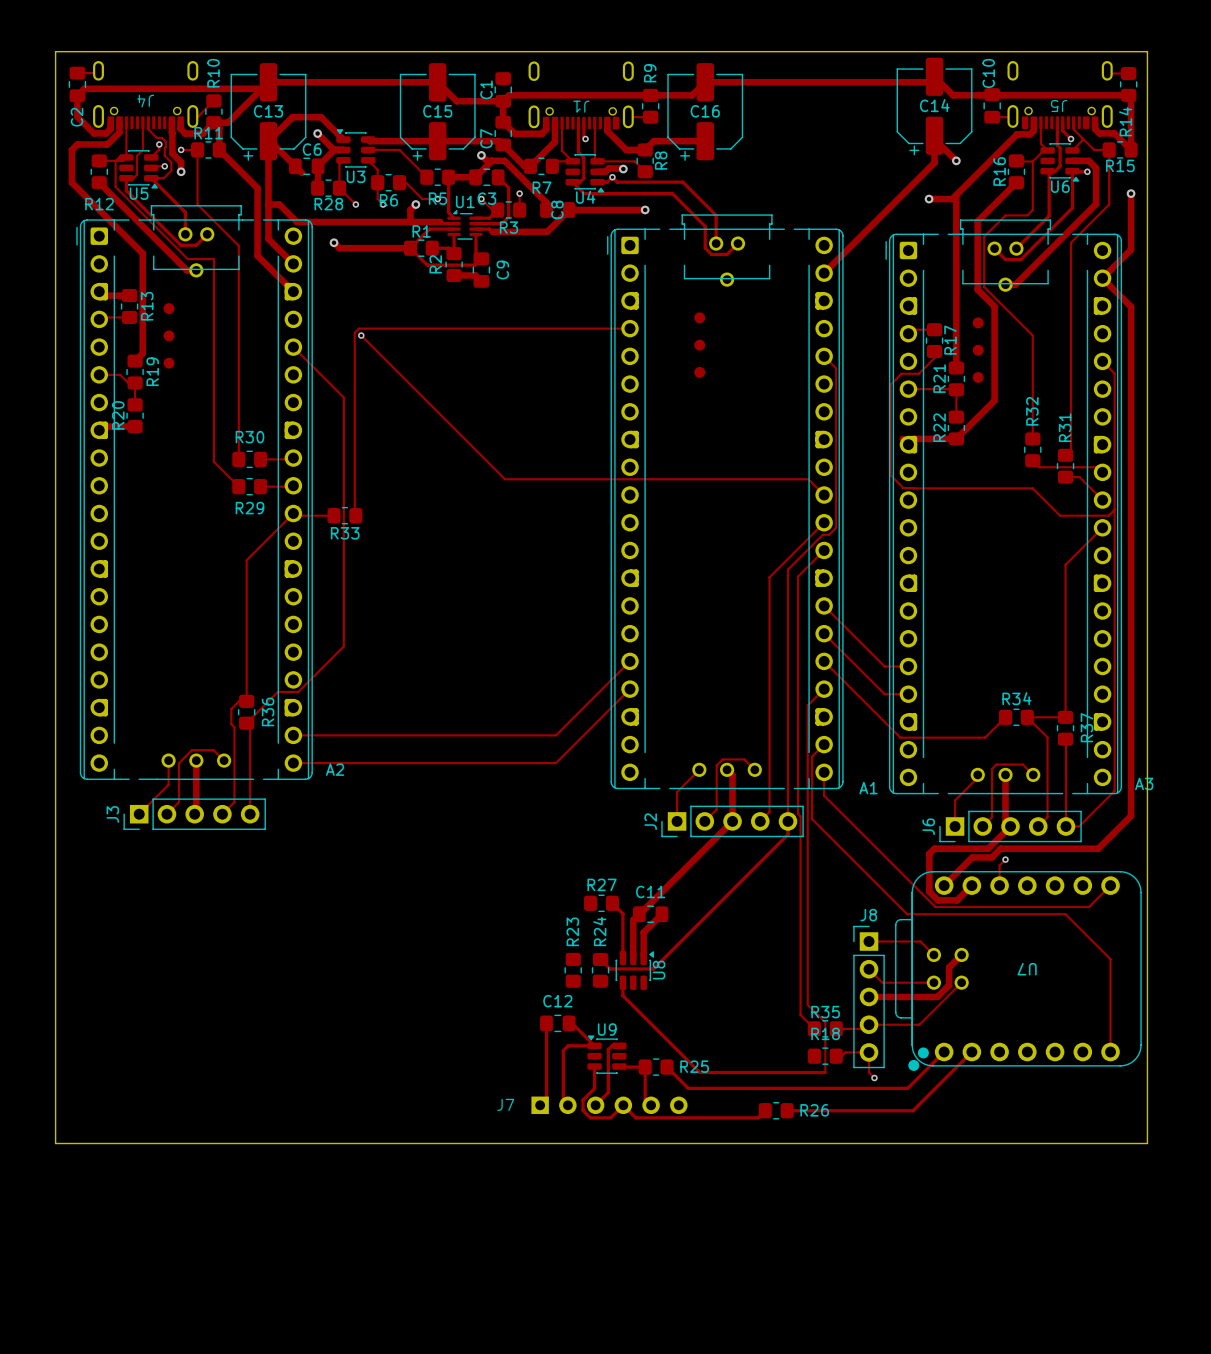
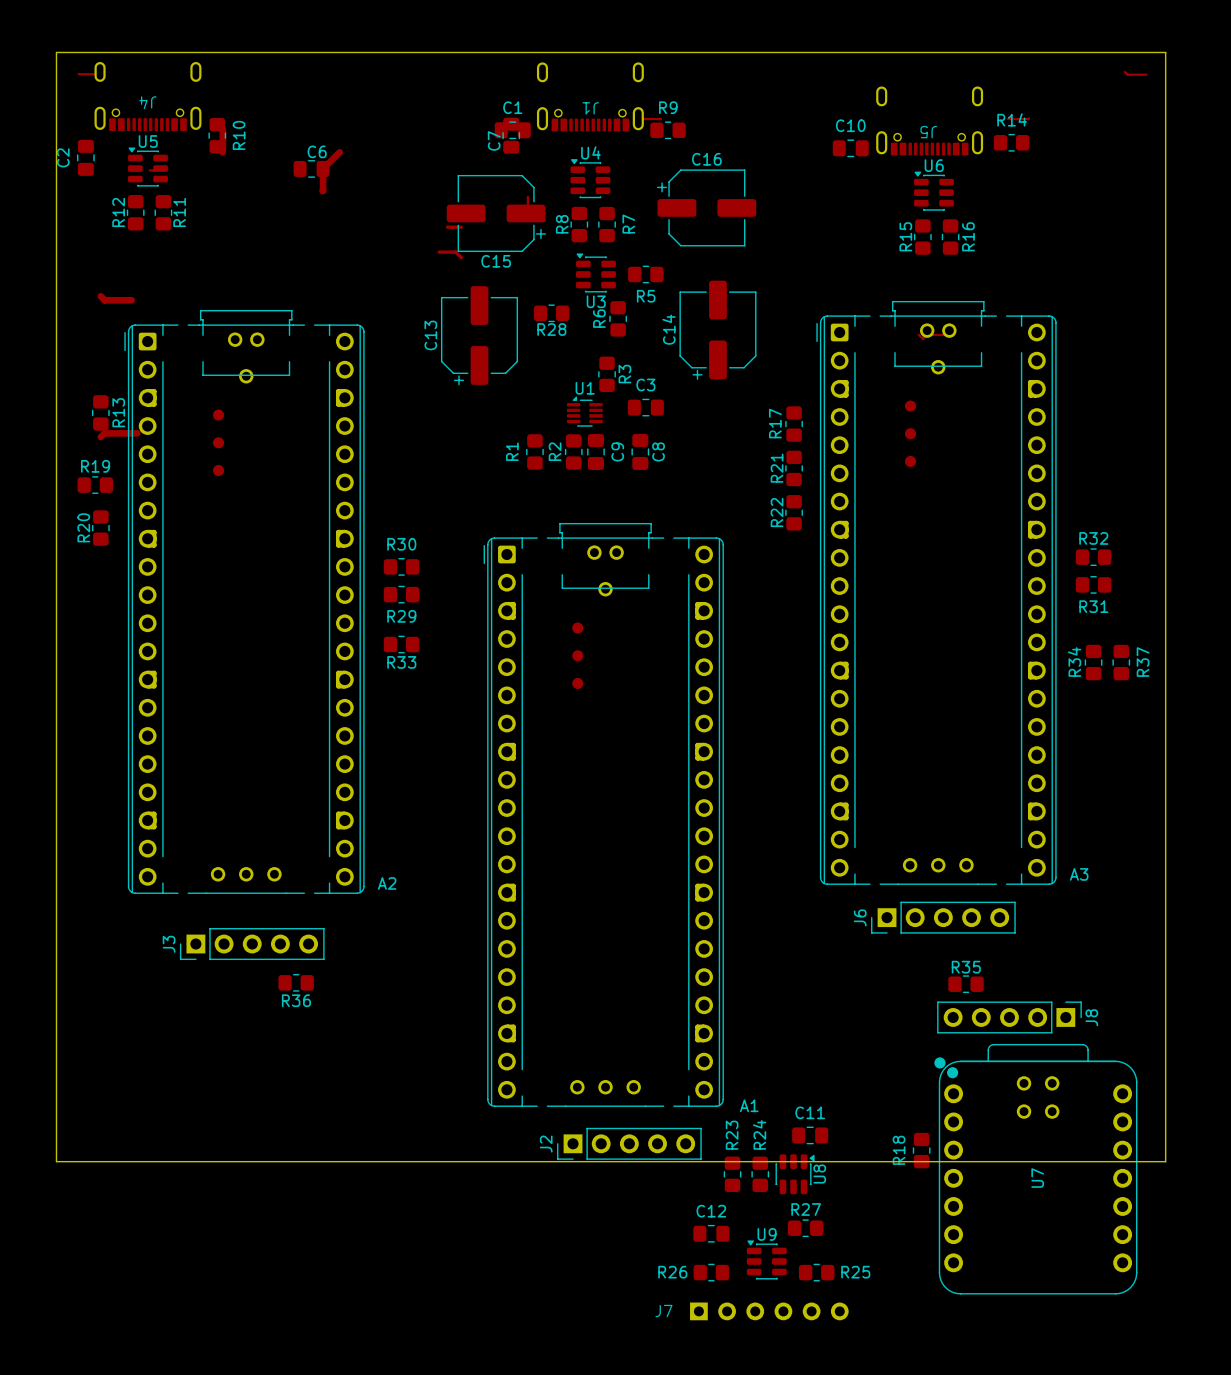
C13 footprint: [230, 63, 307, 161] -> [441, 286, 518, 386]
C16 footprint: [667, 63, 744, 161] -> [656, 169, 757, 247]
R10 name position: R10 (213, 73) -> R10 (239, 135)
C2 position: (77, 84) -> (85, 157)
R14 rotation: 0° (1128, 84) -> 90° clockwise (1011, 142)
R14 position: (1128, 84) -> (1011, 142)
track: (261, 88) (84, 88) (77, 95) (77, 116) (93, 133) (106, 133) (110, 128) (110, 122) -> none
C1 rotation: 0° (503, 89) -> 90° clockwise (512, 130)
C1 position: (503, 89) -> (512, 130)
J5 position: (1060, 94) -> (929, 120)
track: (1128, 95) (953, 95) (934, 76) (929, 82) (705, 82) (692, 95) (509, 95) (503, 101) -> none
track: (1128, 95) (1131, 97) (1131, 149) (1114, 133) (1099, 133) (1095, 128) (1095, 122) -> none
track: (213, 100) (198, 116) (192, 116) -> none
track: (503, 101) (503, 122) (514, 133) (541, 133) (546, 129) (546, 123) -> none
track: (503, 101) (456, 101) (437, 82) (268, 82) (228, 122) (213, 122) (202, 133) (185, 133) (180, 128) (180, 122) -> none
C14 name rotation: 0° (934, 105) -> 90° counterclockwise (669, 329)
C14 name position: C14 (934, 105) -> C14 (669, 329)
C10 rotation: 0° (992, 105) -> 90° clockwise (850, 148)
C10 position: (992, 105) -> (850, 148)
R9 rotation: 0° (650, 106) -> 90° clockwise (668, 130)
R9 position: (650, 106) -> (668, 130)
C14 position: (934, 106) -> (717, 330)
R10 position: (213, 111) -> (217, 135)
C13 name position: C13 (268, 111) -> C13 (430, 335)
C15 rotation: 0° (437, 111) -> 90° counterclockwise (496, 213)
C15 position: (437, 111) -> (496, 213)
C15 name position: C15 (437, 111) -> C15 (496, 261)
C16 name position: C16 (705, 111) -> C16 (706, 159)
C2 name position: C2 (77, 117) -> C2 (63, 157)
R14 name position: R14 (1125, 121) -> R14 (1012, 119)
track: (119, 122) (119, 132) (107, 144) (77, 144) (71, 149) (71, 182) (142, 253) (142, 353) (135, 361) -> none
track: (126, 122) (126, 157) (119, 157) (115, 160) (115, 186) (187, 259) (213, 259) (213, 461) (238, 486) -> none
track: (142, 122) (142, 149) (136, 155) (136, 174) (133, 178) (126, 178) -> none
track: (148, 122) (148, 129) (156, 137) (162, 137) (165, 141) (164, 155) (171, 162) (171, 170) (163, 178) (151, 178) (185, 212) (185, 234) -> none
track: (171, 122) (172, 153) (181, 162) (181, 171) -> none
track: (1033, 122) (1033, 130) (1030, 134) (1017, 134) (952, 199) (929, 199) -> none
track: (1040, 122) (1040, 143) (1047, 150) (1043, 150) (1032, 161) -> none
track: (1057, 122) (1060, 166) (1055, 171) (1047, 171) (1049, 215) (1016, 248) -> none
track: (1062, 122) (1062, 130) (1071, 139) -> none
track: (1073, 122) (1073, 129) (1094, 149) (1109, 149) (1109, 204) (1071, 242) (1071, 449) (1065, 455) -> none
track: (554, 123) (554, 141) (530, 166) (524, 166) (499, 141) (369, 141) (368, 139) -> none
track: (562, 123) (562, 150) (572, 161) (557, 161) (552, 166) -> none
track: (578, 123) (578, 152) (583, 157) (583, 178) (579, 182) (572, 182) (584, 193) (672, 193) (705, 226) (705, 248) (711, 254) (727, 254) (737, 243) -> none
track: (583, 123) (585, 139) -> none
track: (594, 123) (594, 158) (597, 161) (634, 161) (645, 171) -> none
track: (607, 123) (607, 131) (626, 149) (645, 149) (653, 141) (705, 141) -> none
track: (317, 133) (334, 149) (343, 149) -> none
via: (317, 133) -> none
track: (934, 135) (934, 162) (824, 273) -> none
track: (1082, 138) (1072, 150) -> none
track: (343, 139) (321, 117) (292, 117) (268, 141) -> none
via: (585, 139) -> none
track: (934, 139) (956, 160) -> none
via: (1071, 139) -> none
track: (268, 141) (268, 239) (293, 263) -> none
track: (268, 141) (302, 173) -> none
track: (159, 144) (159, 149) (151, 157) -> none
via: (159, 144) -> none
track: (213, 144) (257, 188) (257, 255) (293, 291) -> none
U3 position: (355, 148) -> (595, 272)
track: (181, 149) (197, 149) (197, 204) (238, 245) (238, 459) -> none
via: (181, 149) -> none
R11 rotation: 0° (208, 149) -> 90° clockwise (163, 212)
R11 position: (208, 149) -> (163, 212)
track: (368, 149) (399, 149) (426, 177) -> none
R15 rotation: 0° (1120, 149) -> 90° clockwise (922, 237)
R15 position: (1120, 149) -> (922, 237)
track: (127, 155) (123, 160) (104, 160) -> none
track: (481, 155) (486, 160) (504, 160) (546, 202) (546, 209) -> none
via: (481, 155) -> none
track: (343, 160) (339, 164) (339, 188) (355, 204) -> none
track: (368, 160) (377, 169) (377, 199) (383, 204) -> none
track: (491, 160) (475, 177) (448, 177) (448, 212) (454, 218) -> none
R8 position: (645, 160) -> (579, 224)
R8 name position: R8 (661, 160) -> R8 (562, 224)
via: (956, 160) -> none
track: (1016, 160) (1032, 161) -> none
track: (1072, 160) (1088, 160) (1096, 168) (1096, 204) (1015, 284) (1005, 284) -> none
track: (1032, 161) (1032, 209) (1027, 215) (1005, 215) (984, 236) (984, 286) (1032, 335) (1032, 438) -> none
U6 rotation: 0° (1060, 162) -> 180° (933, 191)
U6 position: (1060, 162) -> (933, 191)
via: (164, 166) -> none
R7 rotation: 0° (541, 166) -> 90° clockwise (607, 224)
R7 position: (541, 166) -> (607, 224)
U5 rotation: 0° (138, 169) -> 180° (147, 167)
track: (623, 169) (608, 168) (605, 171) (597, 171) -> none
via: (623, 169) -> none
R12 position: (99, 171) -> (135, 212)
via: (181, 171) -> none
R16 name position: R16 (999, 171) -> R16 (968, 236)
R16 position: (1016, 171) -> (950, 237)
track: (1087, 171) (1072, 171) (1072, 207) (1020, 259) (1005, 259) (994, 248) -> none
via: (1087, 171) -> none
U4 rotation: 0° (585, 173) -> 180° (590, 178)
R5 position: (437, 177) -> (645, 274)
C3 position: (486, 177) -> (645, 407)
track: (498, 177) (508, 187) (508, 217) (502, 223) (476, 223) -> none
via: (612, 177) -> none
track: (126, 178) (126, 190) (180, 245) (196, 245) (207, 234) -> none
track: (99, 182) (186, 270) (196, 270) -> none
R6 rotation: 0° (388, 182) -> 90° clockwise (618, 318)
R6 position: (388, 182) -> (618, 318)
track: (399, 182) (406, 182) (422, 199) (437, 199) -> none
track: (597, 182) (607, 182) (612, 177) (617, 182) (682, 182) (716, 215) (716, 243) -> none
track: (1016, 182) (977, 221) (977, 289) (994, 306) (994, 400) (956, 438) (914, 438) (908, 444) (902, 438) -> none
R7 name position: R7 (541, 187) -> R7 (628, 224)
R28 position: (328, 188) -> (551, 313)
via: (519, 193) -> none
track: (1131, 193) (1131, 249) (1102, 278) (1131, 306) (1131, 815) (1098, 848) (1000, 848) (991, 857) (972, 857) (944, 885) -> none
via: (1131, 193) -> none
track: (956, 195) (956, 367) -> none
C3 name position: C3 (486, 198) -> C3 (645, 384)
via: (437, 199) -> none
track: (481, 199) (492, 209) (497, 209) (489, 218) (476, 218) -> none
via: (481, 199) -> none
via: (929, 199) -> none
R12 name rotation: 0° (99, 204) -> 90° counterclockwise (118, 212)
track: (268, 204) (279, 204) (296, 221) (440, 221) -> none
via: (355, 204) -> none
via: (383, 204) -> none
track: (415, 204) (410, 209) (410, 221) -> none
via: (415, 204) -> none
R3 rotation: 0° (508, 209) -> 90° clockwise (607, 374)
R3 position: (508, 209) -> (607, 374)
C8 rotation: 0° (557, 209) -> 90° clockwise (640, 451)
C8 position: (557, 209) -> (640, 451)
track: (645, 209) (569, 209) (547, 231) (492, 231) (489, 229) (476, 229) -> none
via: (645, 209) -> none
U1 position: (465, 224) -> (584, 411)
R3 name position: R3 (508, 227) -> R3 (624, 374)
track: (454, 229) (429, 229) (410, 248) -> none
R1 name position: R1 (421, 231) -> R1 (512, 451)
track: (454, 234) (454, 253) -> none
track: (476, 234) (476, 253) (481, 258) (475, 265) (427, 265) (410, 248) -> none
track: (334, 242) (339, 248) (410, 248) -> none
via: (334, 242) -> none
R1 rotation: 0° (421, 248) -> 90° clockwise (534, 451)
R1 position: (421, 248) -> (534, 451)
R2 position: (454, 264) -> (573, 451)
C9 position: (481, 270) -> (595, 451)
track: (454, 275) (475, 275) (481, 281) -> none
R13 position: (129, 306) -> (100, 412)
track: (129, 317) (101, 317) (99, 319) -> none
track: (630, 328) (358, 328) (354, 332) (355, 515) -> none
track: (361, 335) (505, 479) (808, 479) (824, 495) -> none
via: (361, 335) -> none
R17 position: (934, 340) -> (794, 424)
R17 name position: R17 (950, 340) -> R17 (775, 423)
track: (293, 347) (343, 397) (343, 646) (298, 691) (277, 691) (246, 723) (250, 726) (250, 814) (252, 812) -> none
track: (934, 351) (934, 358) (918, 373) (901, 373) (890, 384) (890, 475) (903, 488) (1032, 488) (1060, 515) (1108, 515) (1114, 509) -> none
track: (824, 356) (836, 368) (836, 527) (829, 534) (822, 534) (788, 569) (788, 821) -> none
track: (1102, 361) (1114, 373) (1114, 790) (1079, 826) (1065, 826) (1065, 739) -> none
R19 name position: R19 (152, 371) -> R19 (95, 466)
R19 rotation: 0° (135, 372) -> 90° clockwise (95, 485)
R19 position: (135, 372) -> (95, 485)
track: (99, 374) (120, 374) (128, 382) (135, 382) (135, 404) -> none
R21 position: (956, 378) -> (794, 468)
track: (914, 395) (908, 389) (955, 389) (956, 417) -> none
R20 position: (135, 415) -> (100, 528)
R22 position: (956, 427) -> (794, 512)
R31 name position: R31 (1065, 427) -> R31 (1093, 606)
R32 rotation: 0° (1032, 449) -> 90° clockwise (1093, 557)
R32 position: (1032, 449) -> (1093, 557)
track: (293, 458) (260, 459) -> none
R30 position: (249, 459) -> (401, 566)
track: (1032, 460) (1039, 467) (1097, 467) (1102, 472) -> none
R31 rotation: 0° (1065, 466) -> 90° clockwise (1093, 584)
R31 position: (1065, 466) -> (1093, 584)
track: (1065, 477) (1079, 477) (1102, 500) -> none
track: (293, 485) (260, 486) -> none
R29 position: (249, 486) -> (401, 594)
A2 position: (194, 492) -> (244, 601)
A1 position: (725, 501) -> (603, 814)
A3 position: (1003, 506) -> (936, 592)
track: (334, 515) (301, 515) (299, 513) (293, 513) (246, 560) (246, 701) (239, 701) (231, 708) (231, 724) (234, 727) (234, 802) (222, 814) -> none
R33 position: (344, 515) -> (401, 644)
track: (824, 522) (769, 577) (769, 812) (760, 821) -> none
track: (1102, 527) (1065, 564) (1065, 717) (1027, 717) (1047, 737) (1047, 817) (1038, 826) -> none
track: (824, 550) (798, 576) (800, 1014) (814, 1028) -> none
track: (824, 605) (884, 666) (908, 666) -> none
track: (824, 633) (884, 694) (908, 694) -> none
track: (630, 661) (556, 735) (293, 735) -> none
track: (824, 661) (900, 737) (985, 737) (1005, 717) -> none
track: (630, 689) (556, 763) (293, 763) -> none
track: (824, 689) (807, 705) (807, 1004) (825, 1022) (825, 1072) (699, 1072) (622, 995) (622, 982) -> none
R34 name position: R34 (1016, 698) -> R34 (1074, 662)
R36 rotation: 0° (246, 712) -> 90° clockwise (296, 982)
R36 position: (246, 712) -> (296, 982)
R34 rotation: 0° (1016, 717) -> 90° clockwise (1093, 662)
R34 position: (1016, 717) -> (1093, 662)
R37 position: (1065, 728) -> (1121, 662)
track: (824, 744) (812, 756) (812, 819) (907, 914) (1065, 914) (1110, 959) (1110, 1052) -> none
track: (168, 760) (168, 784) (139, 814) -> none
track: (196, 760) (196, 812) (194, 814) -> none
track: (224, 760) (213, 750) (192, 750) (178, 763) (178, 802) (166, 814) (170, 814) -> none
track: (699, 769) (677, 792) (677, 821) -> none
track: (727, 769) (732, 775) (732, 821) (633, 920) (633, 957) -> none
track: (754, 769) (744, 759) (722, 759) (716, 765) (716, 809) (704, 821) -> none
track: (974, 771) (977, 777) (955, 800) (955, 826) -> none
track: (824, 772) (824, 795) (935, 906) (1089, 906) (1110, 885) -> none
track: (1005, 774) (1005, 821) (1010, 826) (988, 848) (934, 848) (929, 853) (929, 891) (938, 900) (957, 900) (971, 885) -> none
track: (1033, 774) (1022, 764) (996, 764) (992, 768) (992, 817) (982, 826) -> none
J3 position: (194, 814) -> (252, 944)
J2 position: (732, 821) -> (629, 1143)
track: (788, 821) (788, 834) (653, 968) (610, 968) (600, 959) -> none
J6 position: (1010, 826) -> (943, 917)
track: (1005, 859) (999, 865) (999, 885) -> none
via: (1005, 859) -> none
R27 position: (601, 903) -> (805, 1228)
track: (612, 903) (622, 913) (622, 957) -> none
C11 position: (650, 914) -> (810, 1135)
track: (661, 914) (643, 932) (643, 957) -> none
track: (869, 941) (920, 941) (933, 954) -> none
track: (961, 954) (949, 967) (949, 985) (937, 996) (869, 996) -> none
track: (869, 969) (882, 982) (933, 982) -> none
R23 position: (573, 970) -> (732, 1174)
R24 position: (600, 970) -> (760, 1174)
U8 position: (634, 970) -> (795, 1174)
U7 rotation: 0° (1018, 971) -> 90° clockwise (1035, 1169)
U7 position: (1018, 971) -> (1035, 1169)
track: (961, 982) (919, 1024) (869, 1024) (864, 1028) (836, 1028) -> none
J8 rotation: 0° (869, 996) -> 90° clockwise (1009, 1017)
J8 position: (869, 996) -> (1009, 1017)
track: (546, 1023) (546, 1098) (540, 1105) -> none
C12 position: (557, 1023) -> (711, 1233)
track: (569, 1023) (572, 1023) (594, 1045) (568, 1045) (563, 1050) (563, 1100) (567, 1105) -> none
R35 position: (825, 1028) -> (966, 984)
R18 name position: R18 (825, 1033) -> R18 (899, 1150)
track: (619, 1045) (612, 1045) (608, 1049) (608, 1092) (595, 1105) -> none
track: (944, 1052) (907, 1088) (688, 1088) (667, 1067) -> none
track: (971, 1052) (913, 1110) (787, 1110) -> none
U9 position: (606, 1054) -> (766, 1259)
R18 rotation: 0° (825, 1056) -> 90° clockwise (921, 1150)
R18 position: (825, 1056) -> (921, 1150)
track: (836, 1056) (841, 1056) (845, 1052) (869, 1052) (869, 1072) (874, 1077) -> none
track: (594, 1066) (594, 1088) (583, 1100) (583, 1110) (590, 1117) (610, 1117) (623, 1105) (635, 1117) (758, 1117) (765, 1110) -> none
track: (619, 1066) (645, 1067) (645, 1099) (651, 1105) -> none
R25 position: (656, 1067) -> (816, 1272)
via: (874, 1077) -> none
J7 position: (609, 1105) -> (769, 1311)
R26 position: (776, 1110) -> (711, 1272)
R26 name position: R26 (814, 1110) -> R26 (672, 1272)

